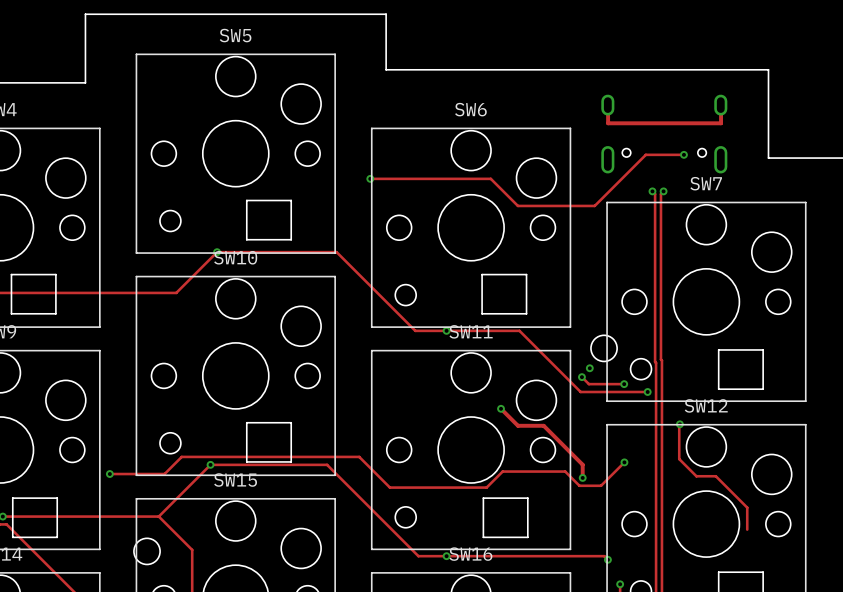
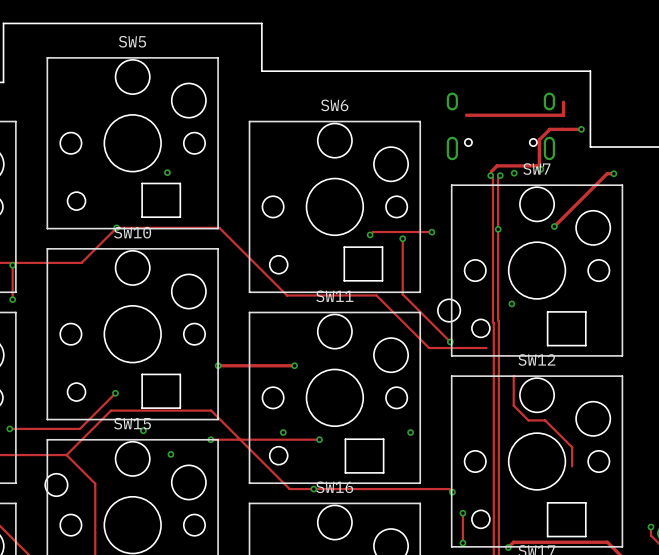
track: (608, 106) (608, 123) (721, 123) (721, 106) -> none
track: none -> (563, 102) (563, 115) (466, 115)
track: none -> (581, 129) (549, 129) (539, 139) (540, 169)
via: none -> (581, 129)
track: (683, 154) (645, 154) (594, 205) (517, 205) (490, 178) (370, 178) -> none
via: (683, 154) -> none
via: (370, 178) -> none
track: none -> (539, 165) (497, 165) (491, 171)
via: none -> (540, 169)
via: none -> (167, 172)
via: none -> (514, 173)
track: none -> (613, 173) (607, 173) (554, 226)
via: none -> (613, 173)
via: none -> (554, 226)
via: none -> (498, 229)
track: none -> (431, 232) (373, 232) (370, 234)
via: none -> (431, 232)
via: none -> (370, 234)
track: none -> (402, 238) (402, 294) (450, 341)
via: none -> (402, 238)
track: none -> (12, 265) (12, 299)
via: none -> (12, 265)
via: (446, 330) -> none
via: none -> (12, 299)
via: none -> (511, 303)
via: (589, 368) -> none
track: (581, 377) (588, 384) (624, 384) -> none
via: (581, 377) -> none
via: none -> (450, 341)
via: (624, 384) -> none
via: (647, 391) -> none
track: (501, 408) (518, 425) (543, 425) (582, 464) (582, 477) -> none
via: (501, 408) -> none
track: none -> (218, 365) (294, 365)
via: none -> (218, 365)
via: none -> (294, 365)
via: (679, 424) -> none
track: none -> (115, 393) (79, 428) (9, 428)
track: (624, 462) (601, 485) (579, 485) (565, 471) (502, 471) (486, 487) (389, 487) (359, 456) (181, 456) (164, 474) (109, 474) -> none
via: (624, 462) -> none
via position: (210, 464) -> (115, 393)
via position: (109, 474) -> (9, 428)
via position: (582, 477) -> (410, 432)
via: none -> (143, 430)
via: none -> (283, 432)
track: none -> (210, 439) (319, 439)
via: none -> (210, 439)
via: none -> (319, 439)
via: none -> (170, 454)

